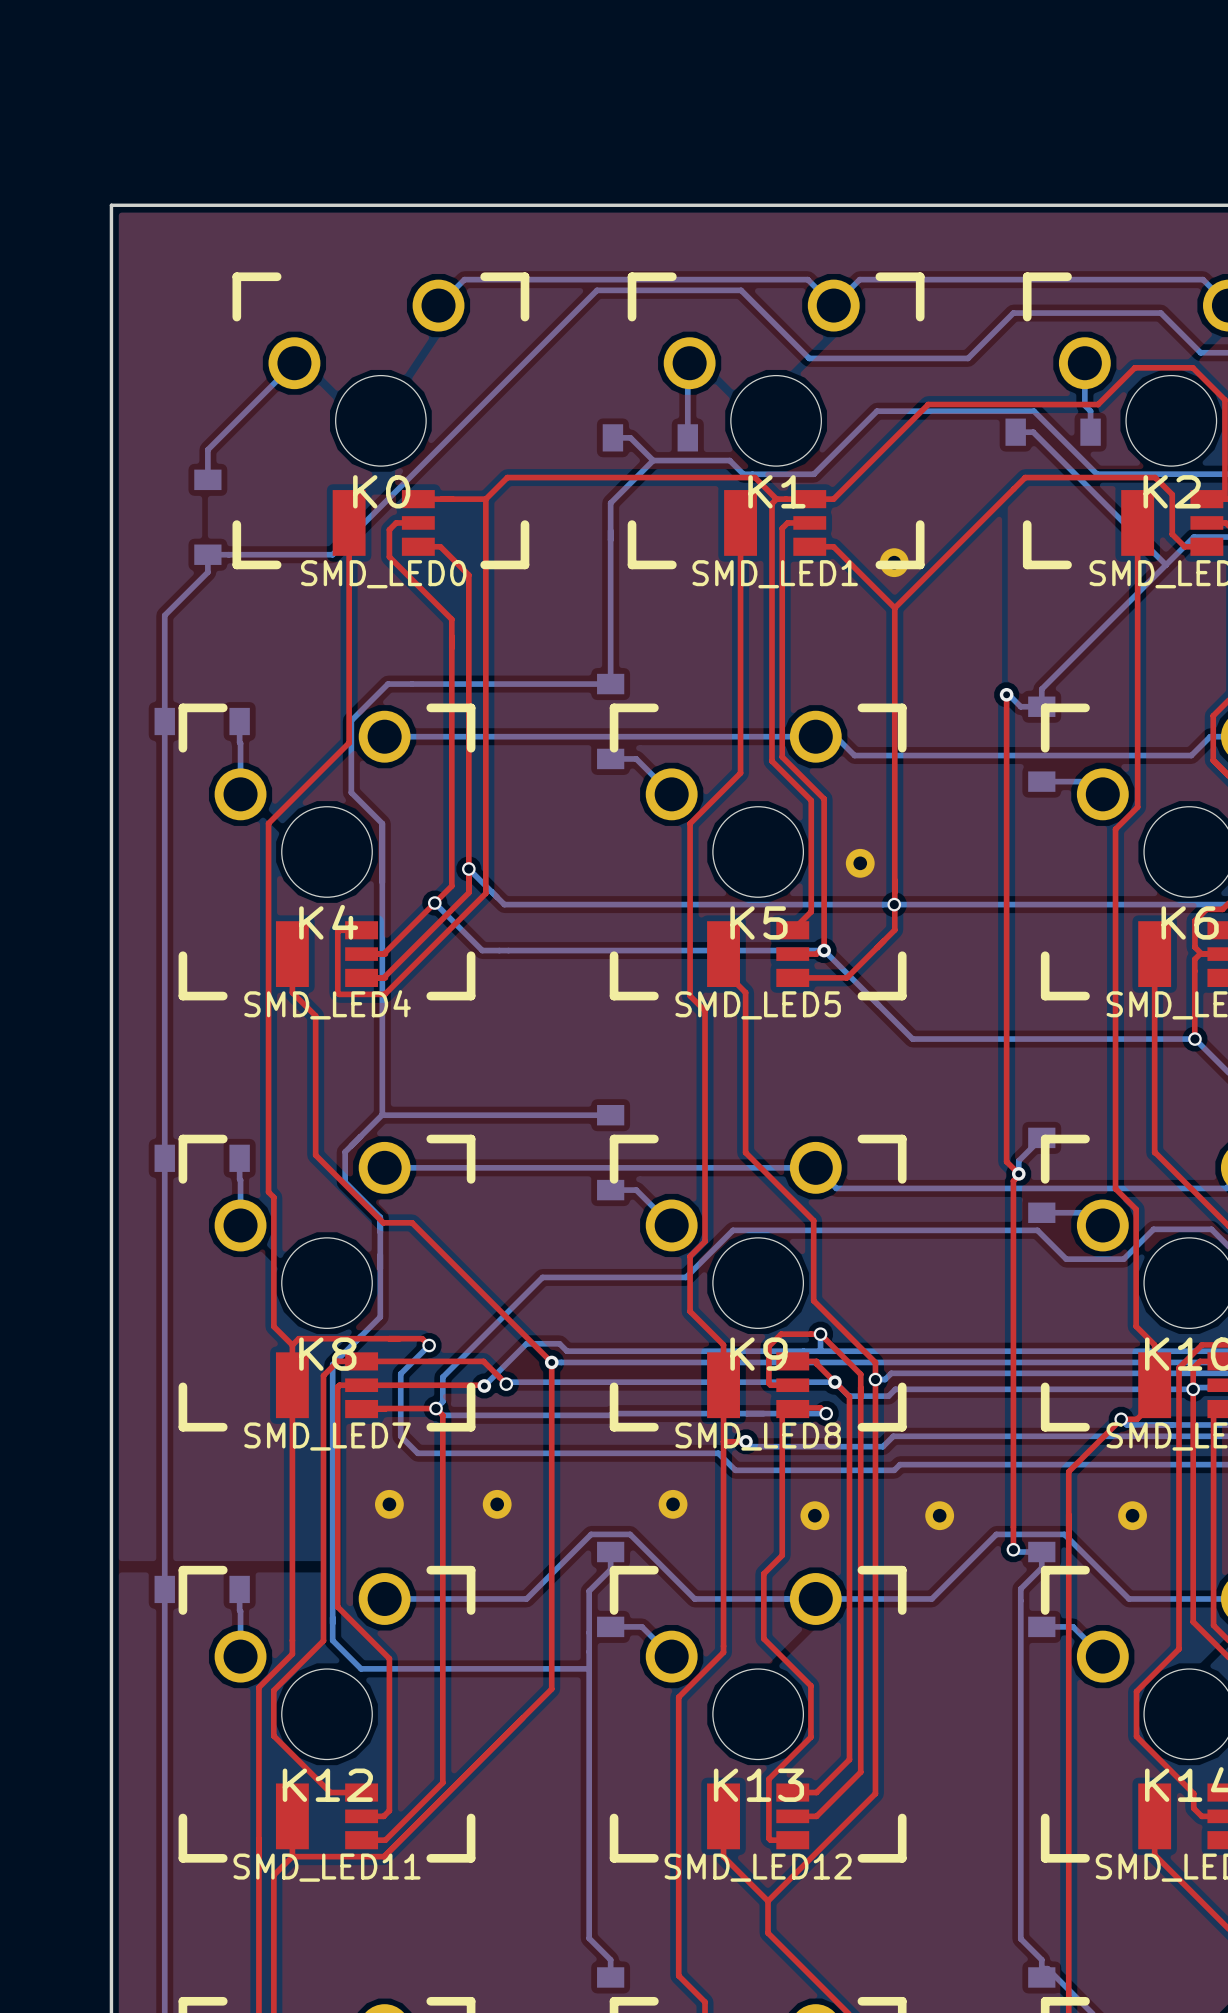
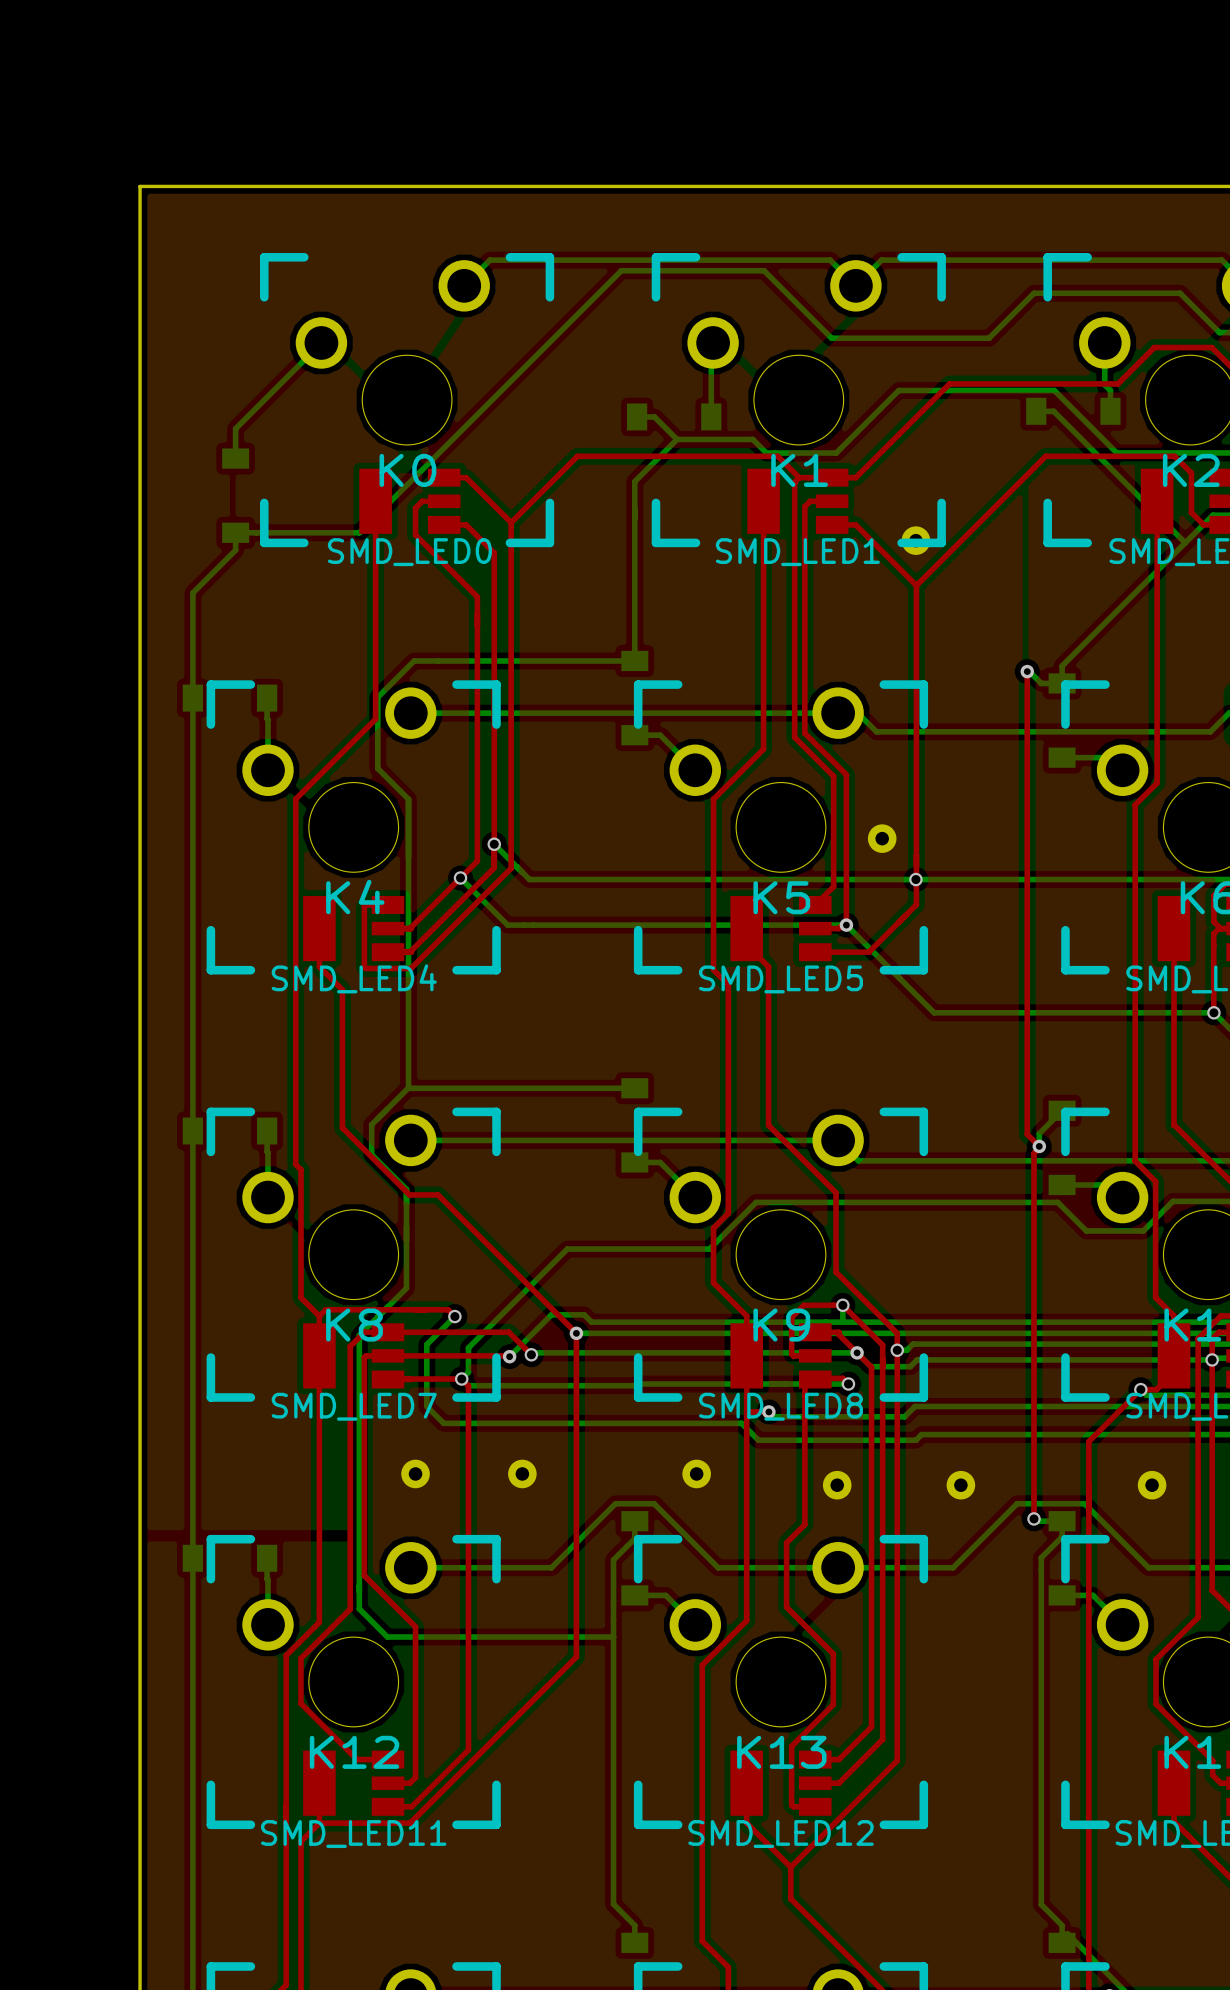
top track: (552, 477) (507, 477) (485, 499) -> (577, 456) (511, 522) (466, 477)
top track: (440, 499) (485, 499) -> none
top track: (485, 499) (485, 544) -> none

